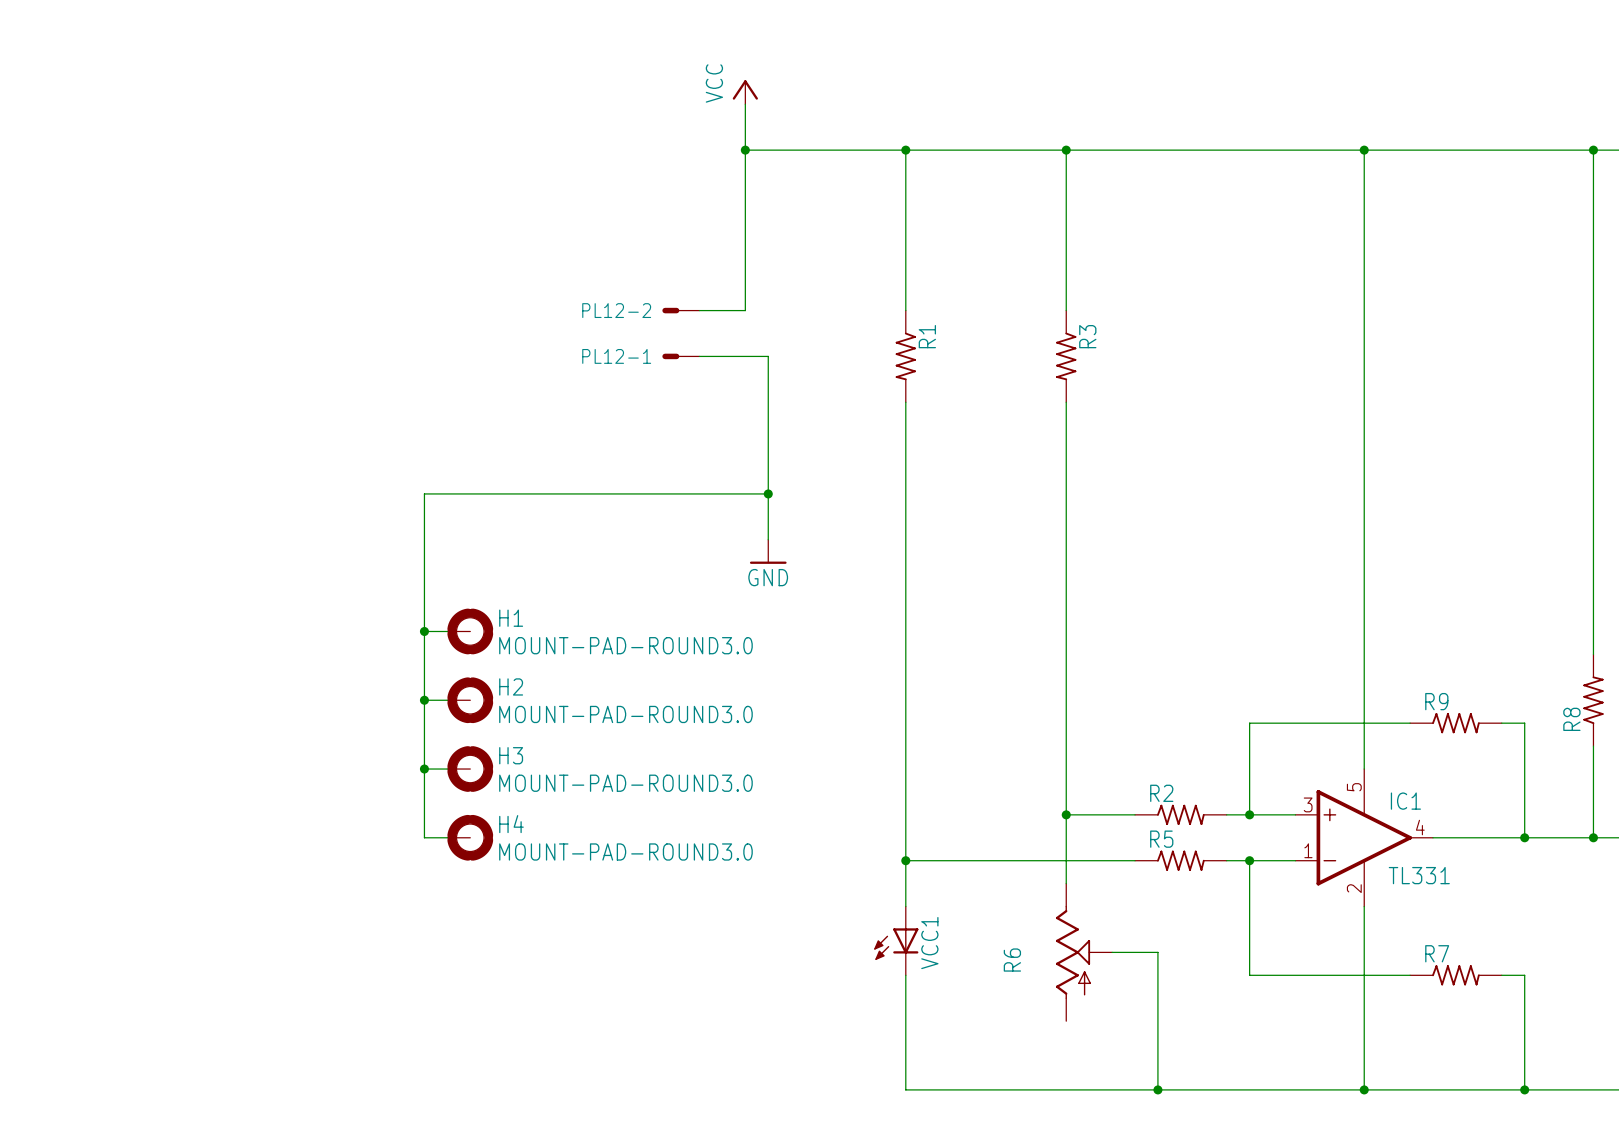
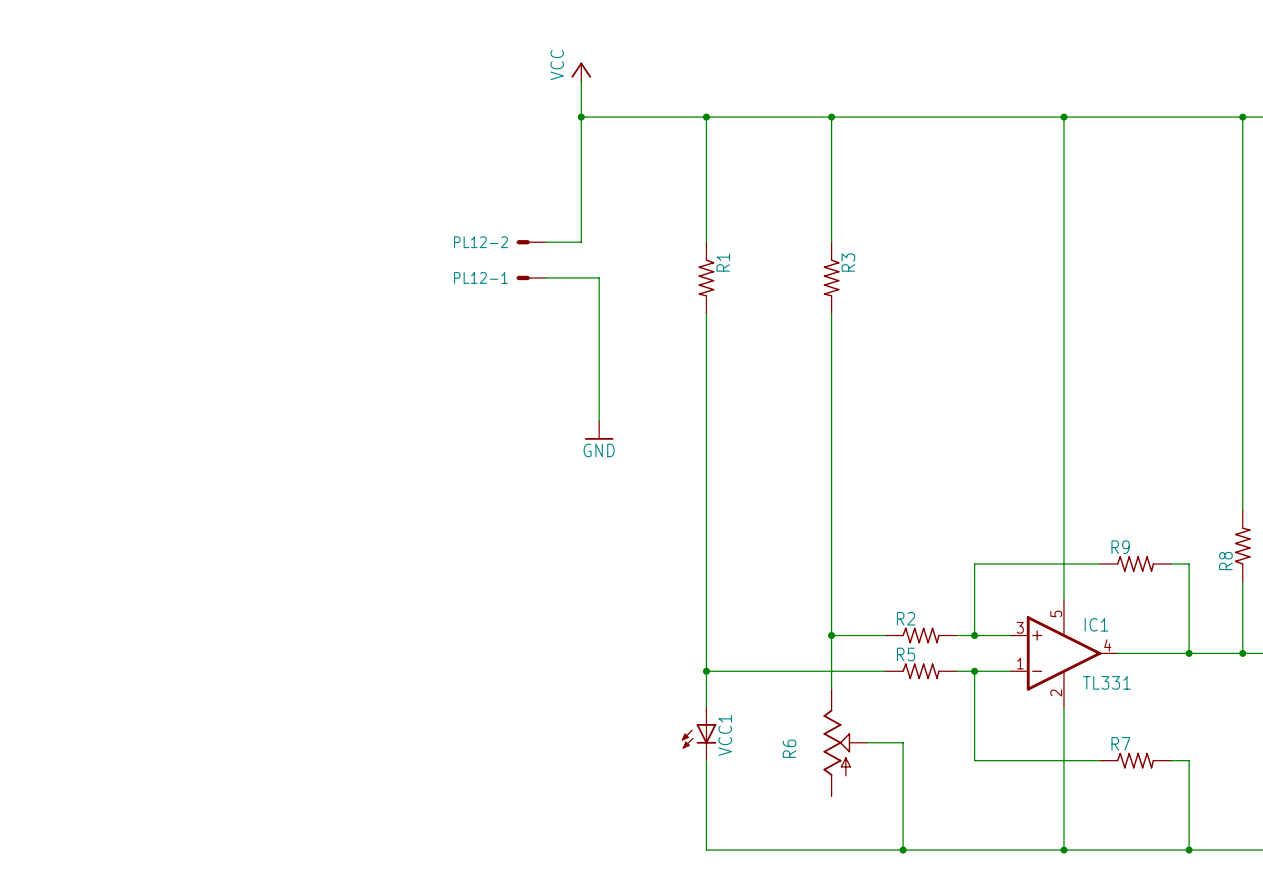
wire: (768, 493) (424, 493) (424, 837) (447, 837) -> none
junction: (768, 493) -> none
wire: (424, 631) (447, 631) -> none
junction: (424, 631) -> none
H1: MOUNT-PAD-ROUND3.0 (470, 631) -> none
wire: (424, 700) (447, 700) -> none
junction: (424, 700) -> none
H2: MOUNT-PAD-ROUND3.0 (470, 700) -> none
wire: (424, 769) (447, 769) -> none
junction: (424, 769) -> none
H3: MOUNT-PAD-ROUND3.0 (470, 769) -> none
H4: MOUNT-PAD-ROUND3.0 (470, 837) -> none

